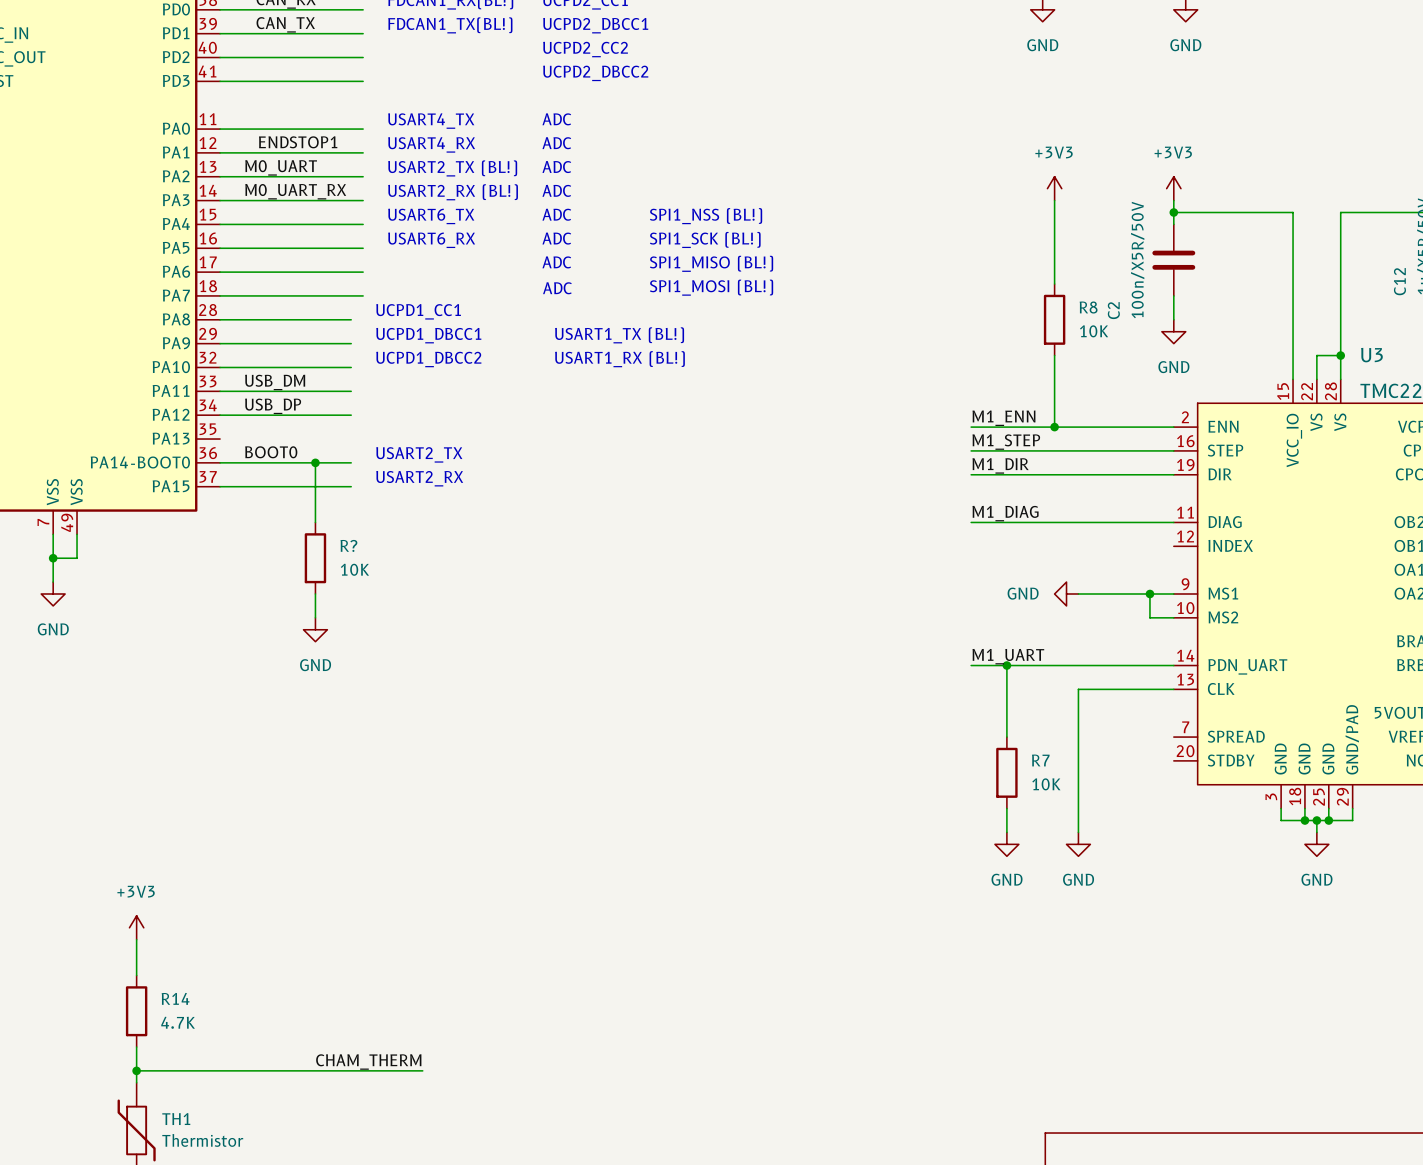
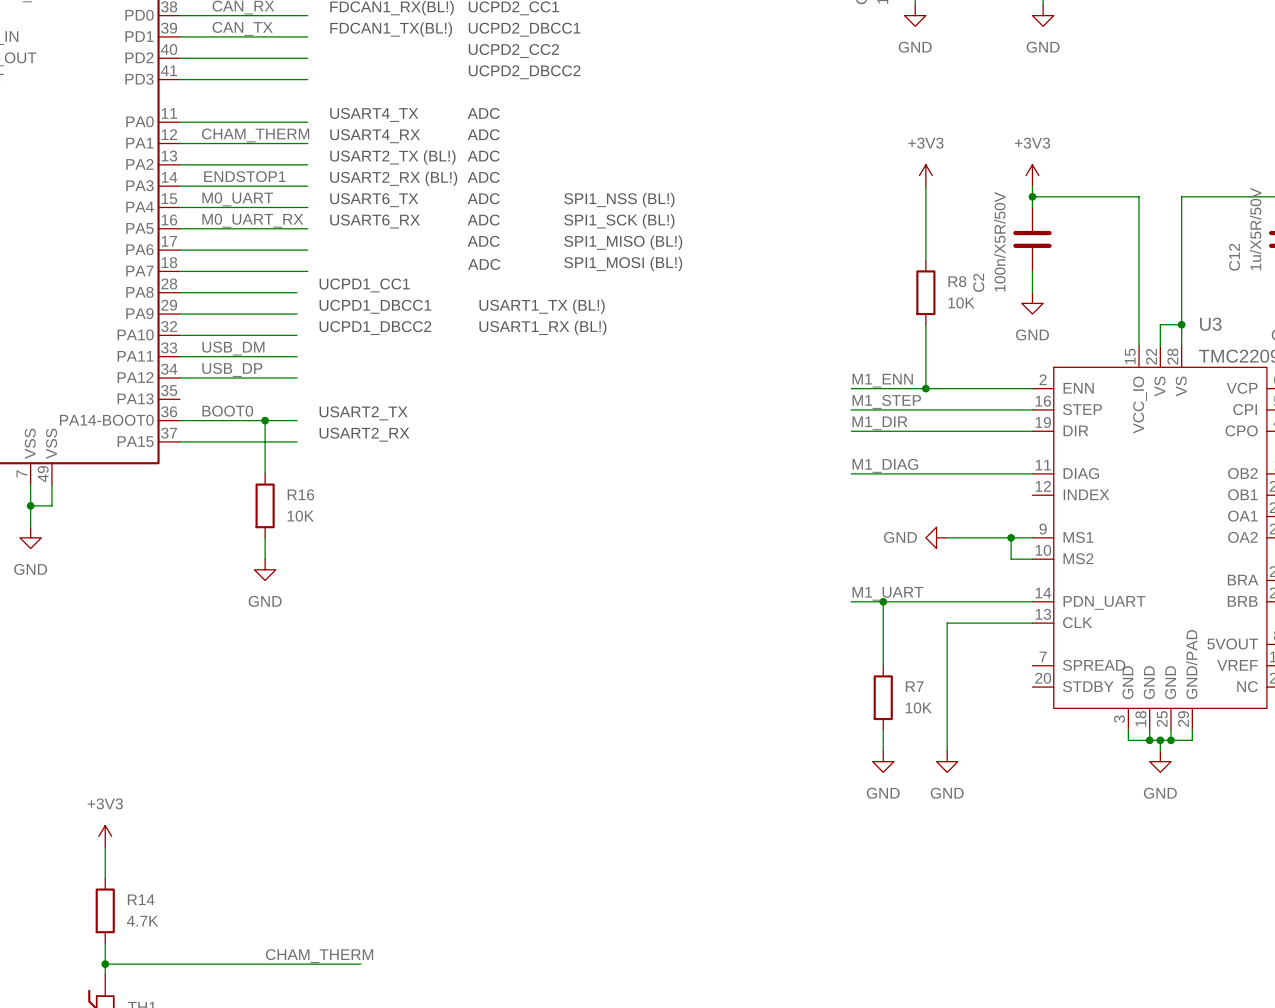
label position: ENDSTOP1 (298, 142) -> ENDSTOP1 (244, 176)
label: none -> CHAM_THERM (255, 135)
label position: M0_UART (281, 167) -> M0_UART (237, 199)
label position: M0_UART_RX (295, 191) -> M0_UART_RX (252, 220)
R? name: R? (348, 545) -> R16 (300, 494)

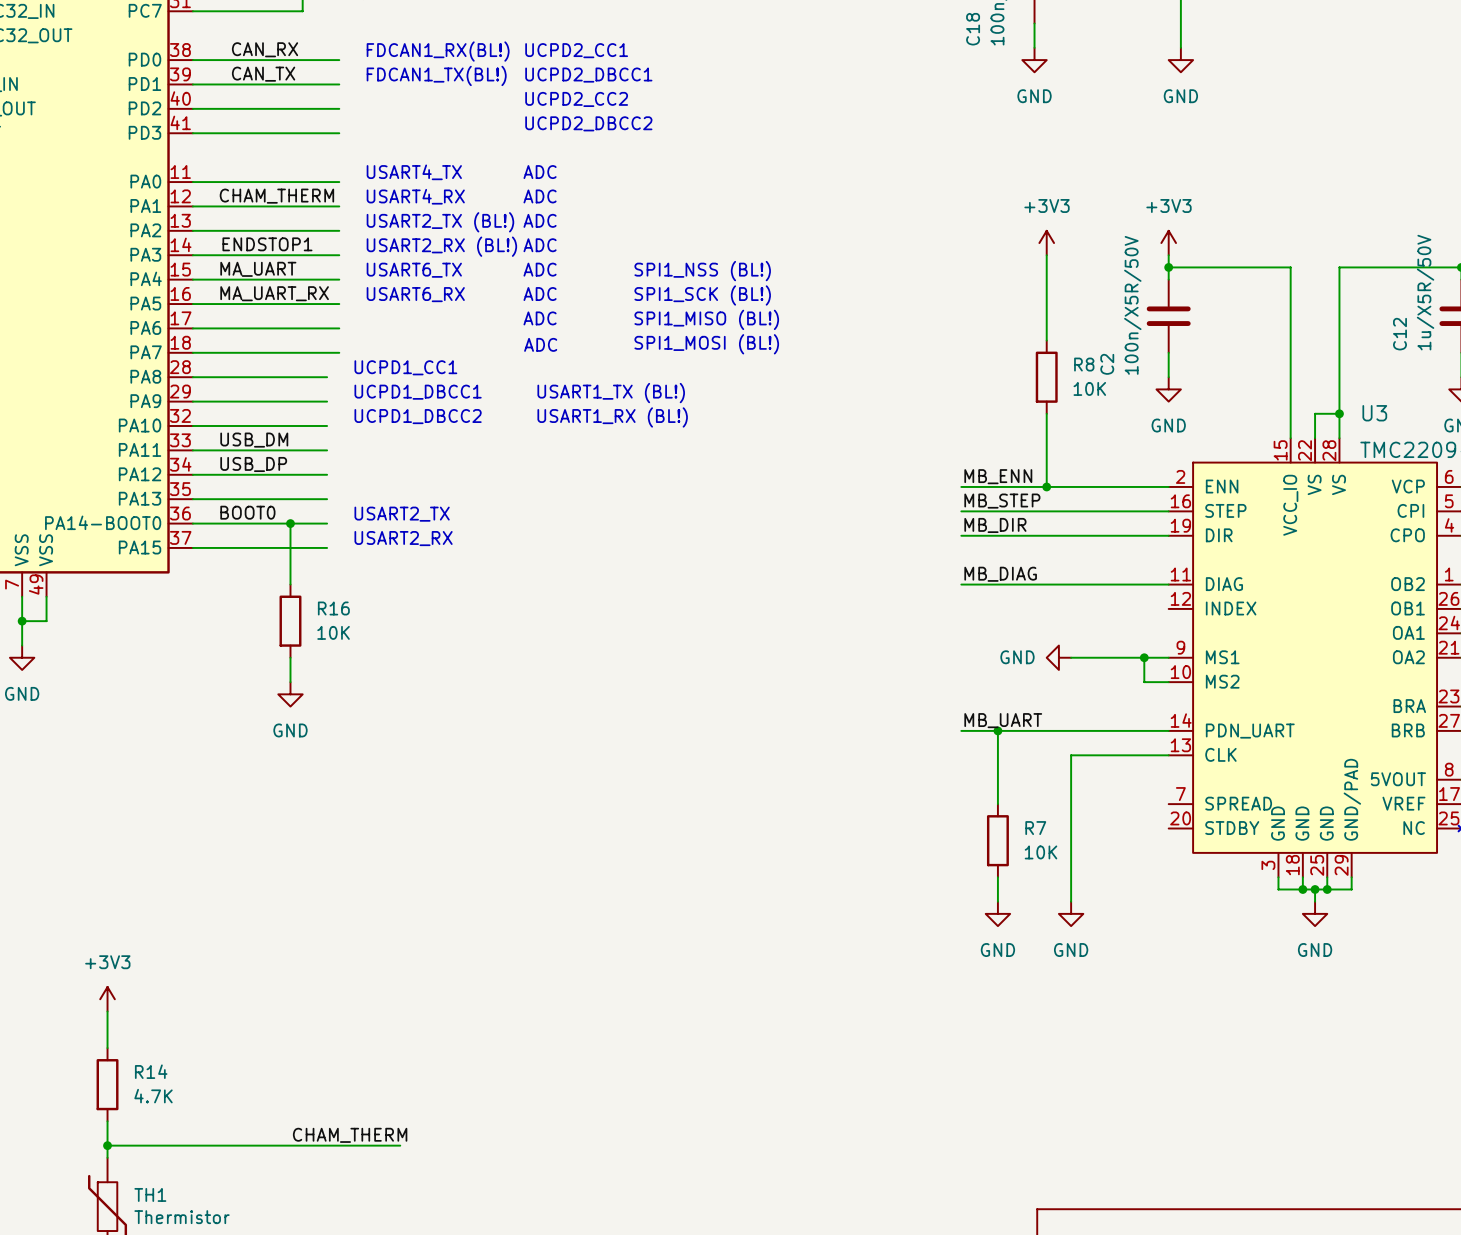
label: M0_UART (237, 199) -> MA_UART (258, 269)
label: M0_UART_RX (252, 220) -> MA_UART_RX (274, 293)
label: M1_ENN (882, 380) -> MB_ENN (998, 476)
wire: none -> (192, 499) (327, 499)
label: M1_STEP (886, 401) -> MB_STEP (1002, 501)
label: M1_DIR (879, 423) -> MB_DIR (995, 525)
label: M1_DIAG (885, 465) -> MB_DIAG (1000, 574)
label: M1_UART (887, 593) -> MB_UART (1003, 720)

